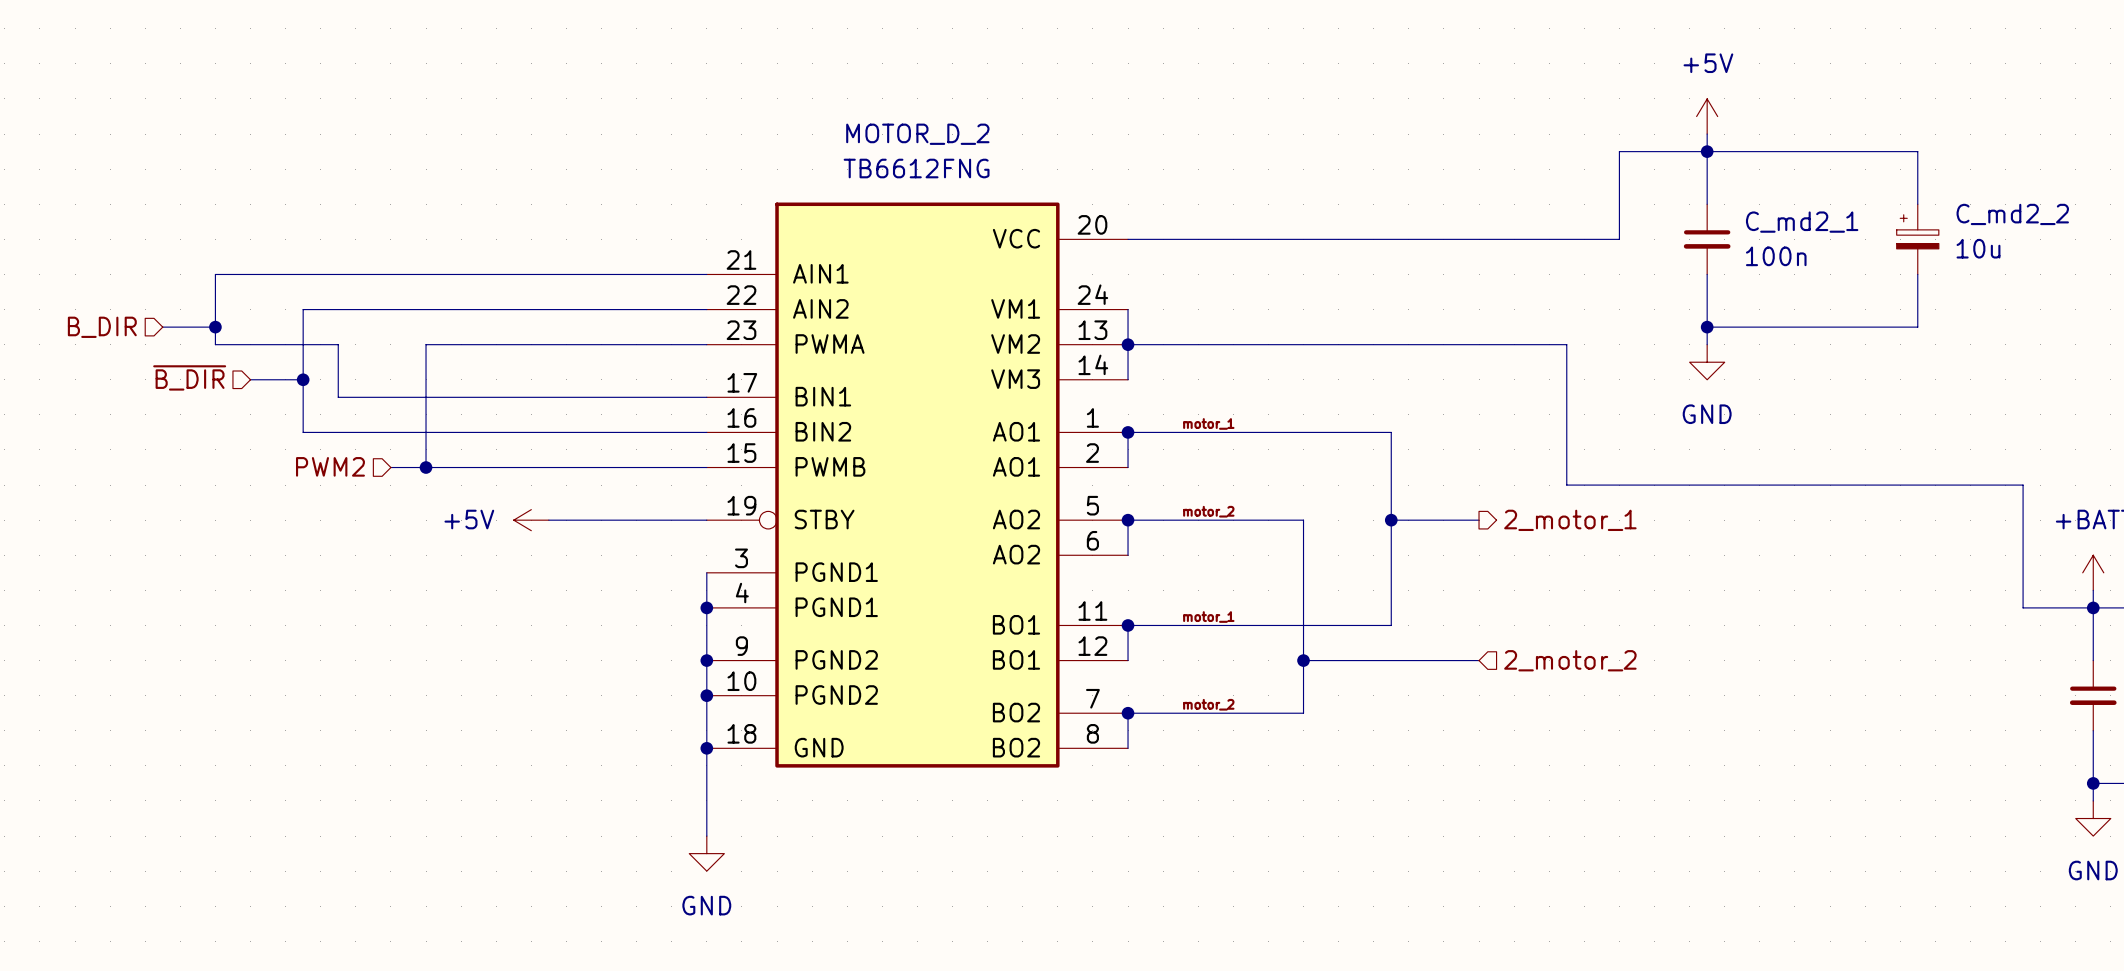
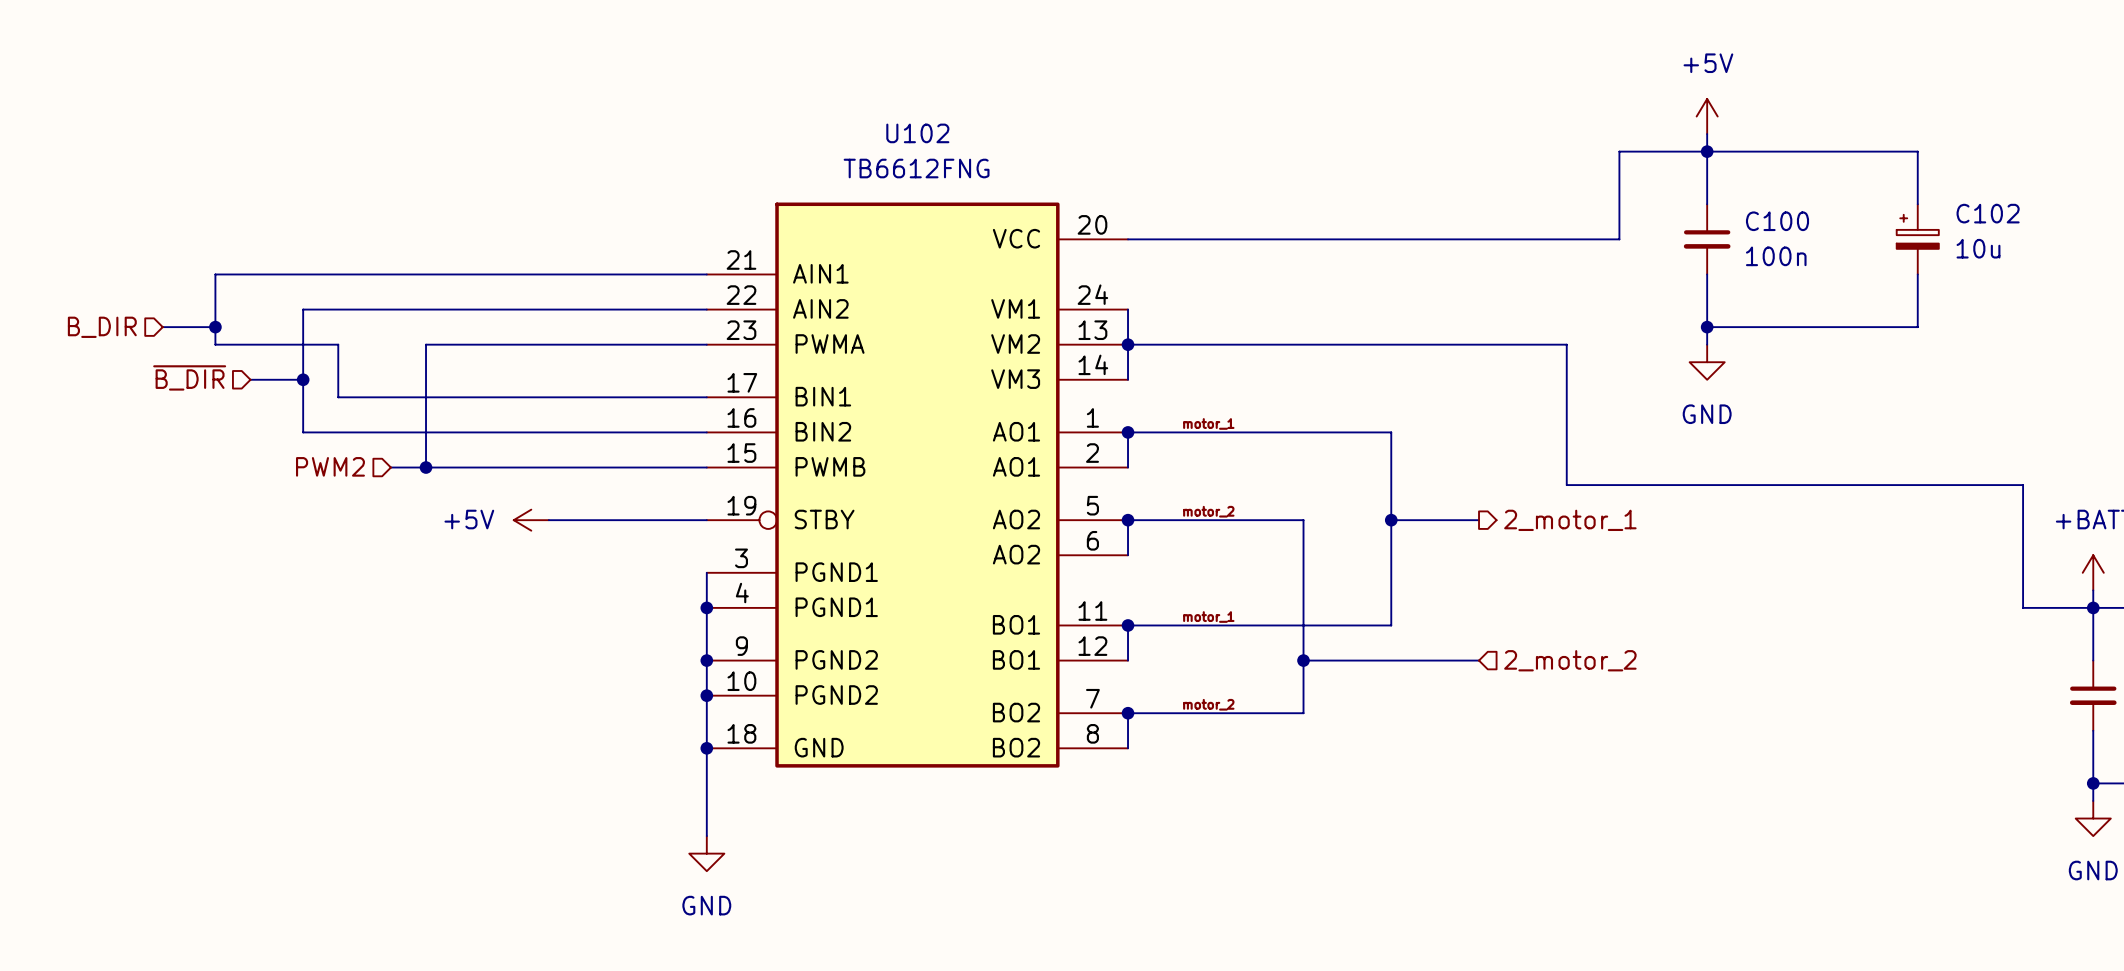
MOTOR_D_2 name: MOTOR_D_2 (917, 134) -> U102 (917, 133)
C_md2_2 name: C_md2_2 (2012, 214) -> C102 (1988, 213)
C_md2_1 name: C_md2_1 (1802, 222) -> C100 (1777, 221)

